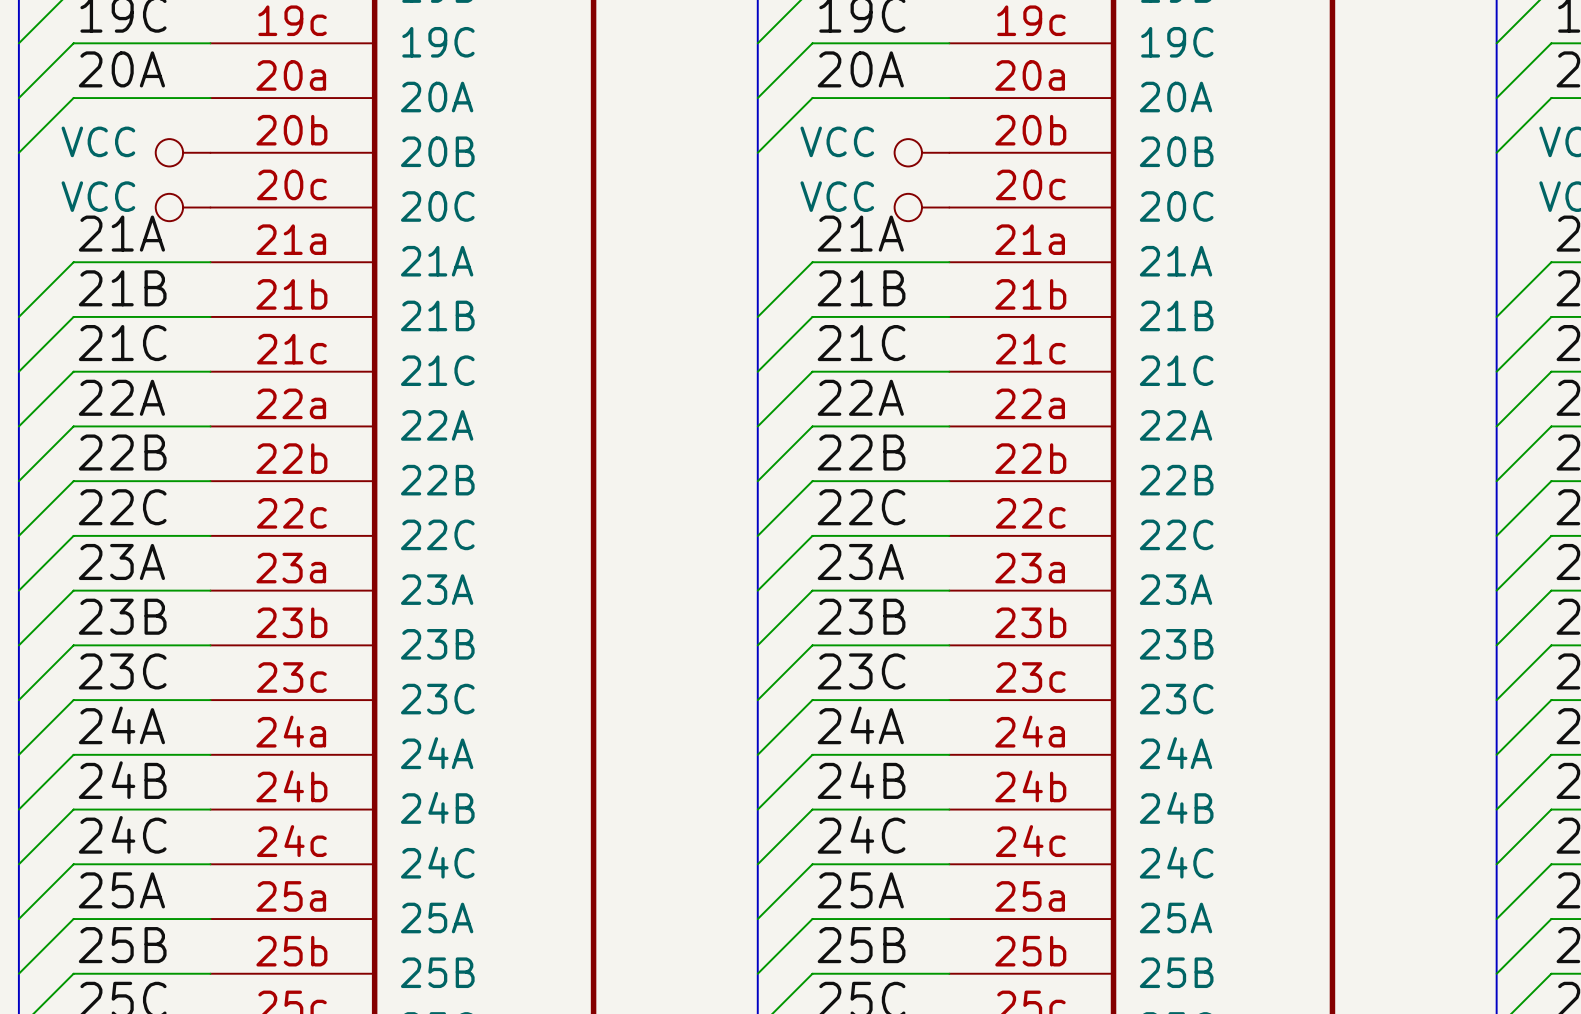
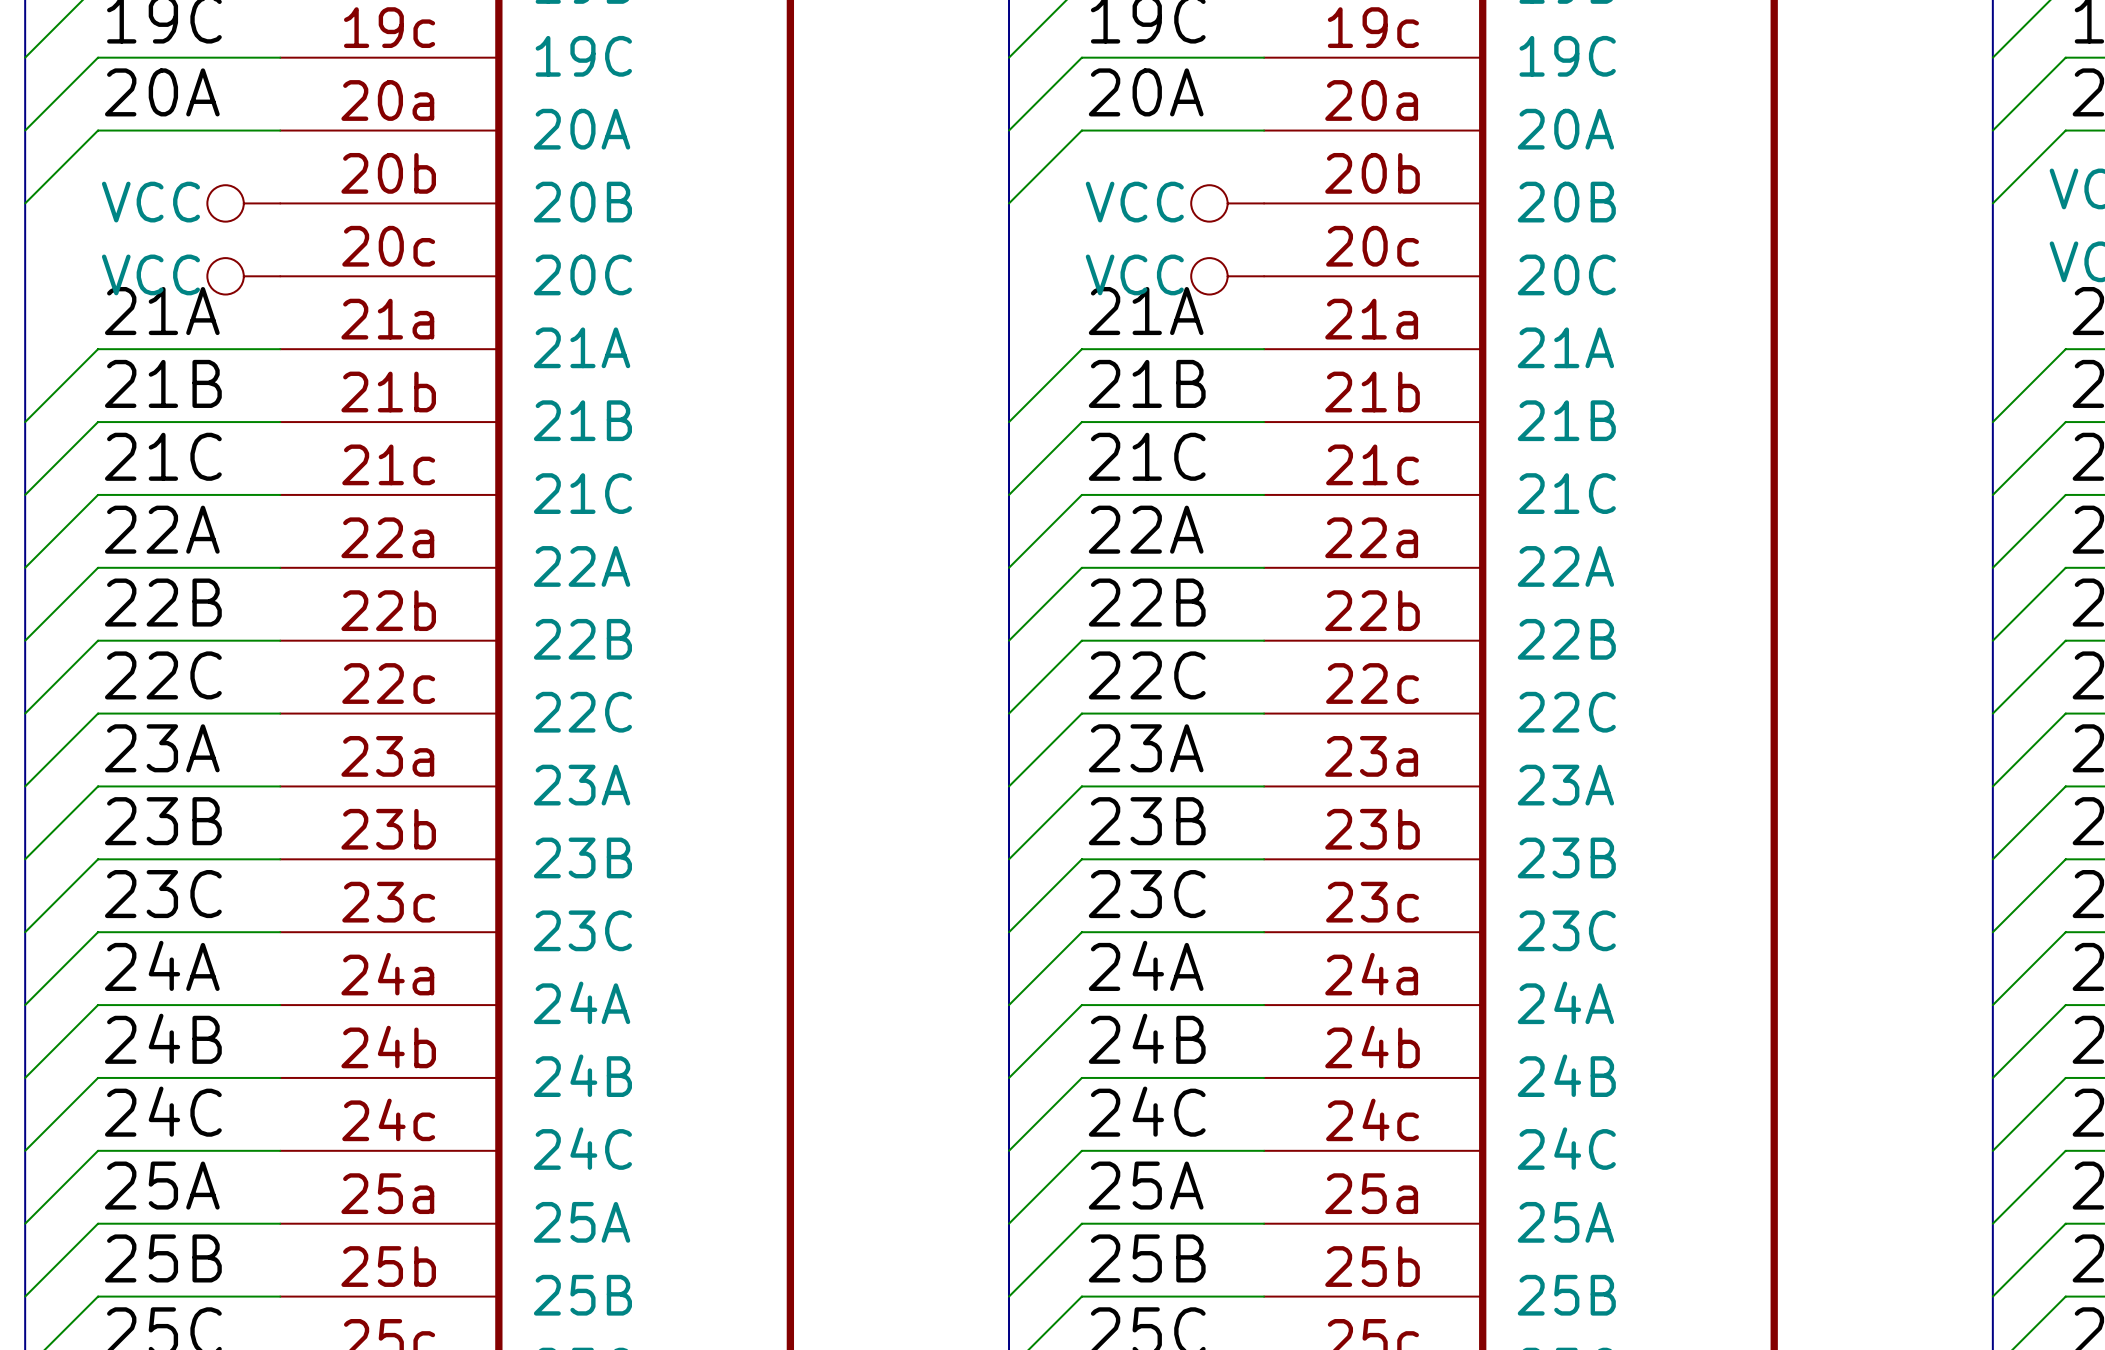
power symbol text position: VCC (98, 141) -> VCC (150, 202)
power symbol text position: VCC (837, 141) -> VCC (1134, 202)
power symbol text position: VCC (98, 196) -> VCC (150, 274)
power symbol text position: VCC (837, 196) -> VCC (1134, 274)

